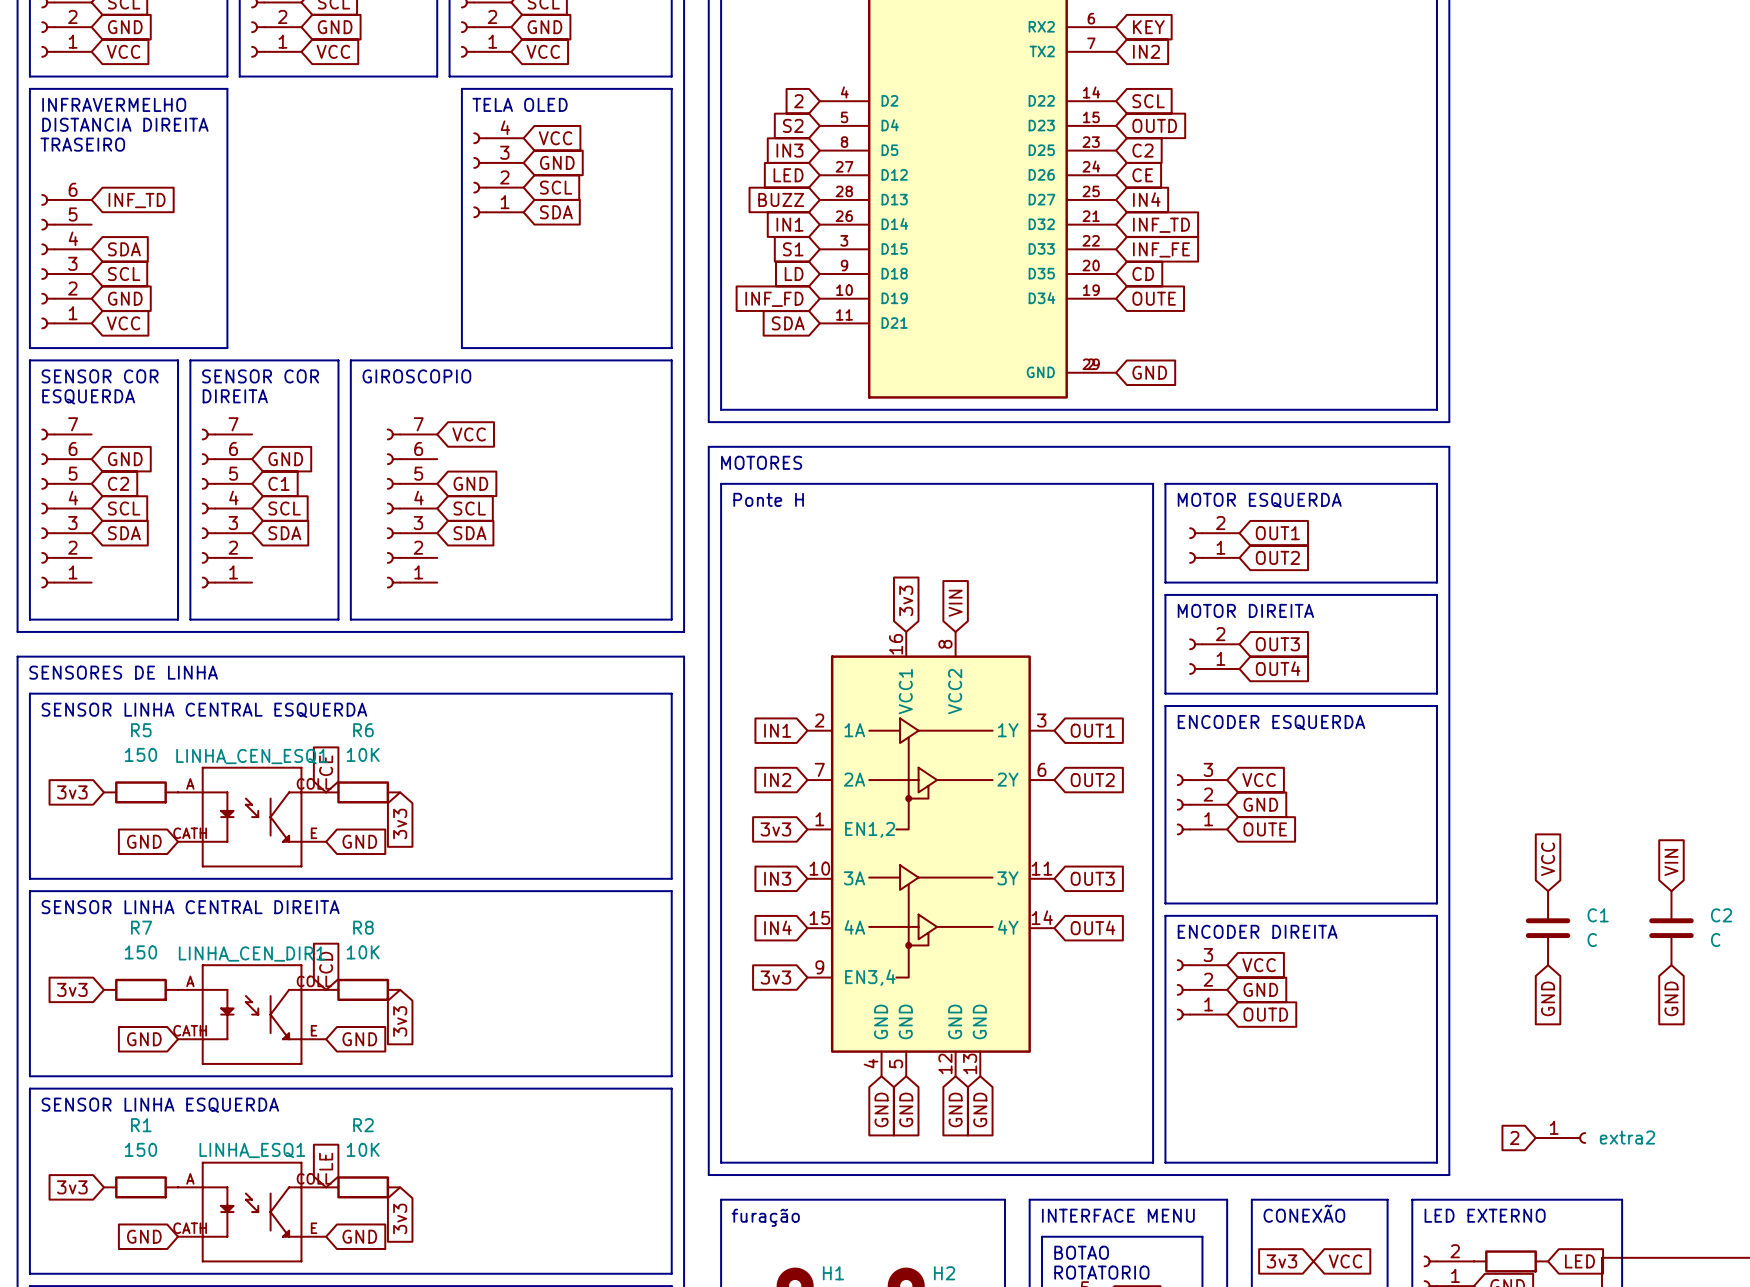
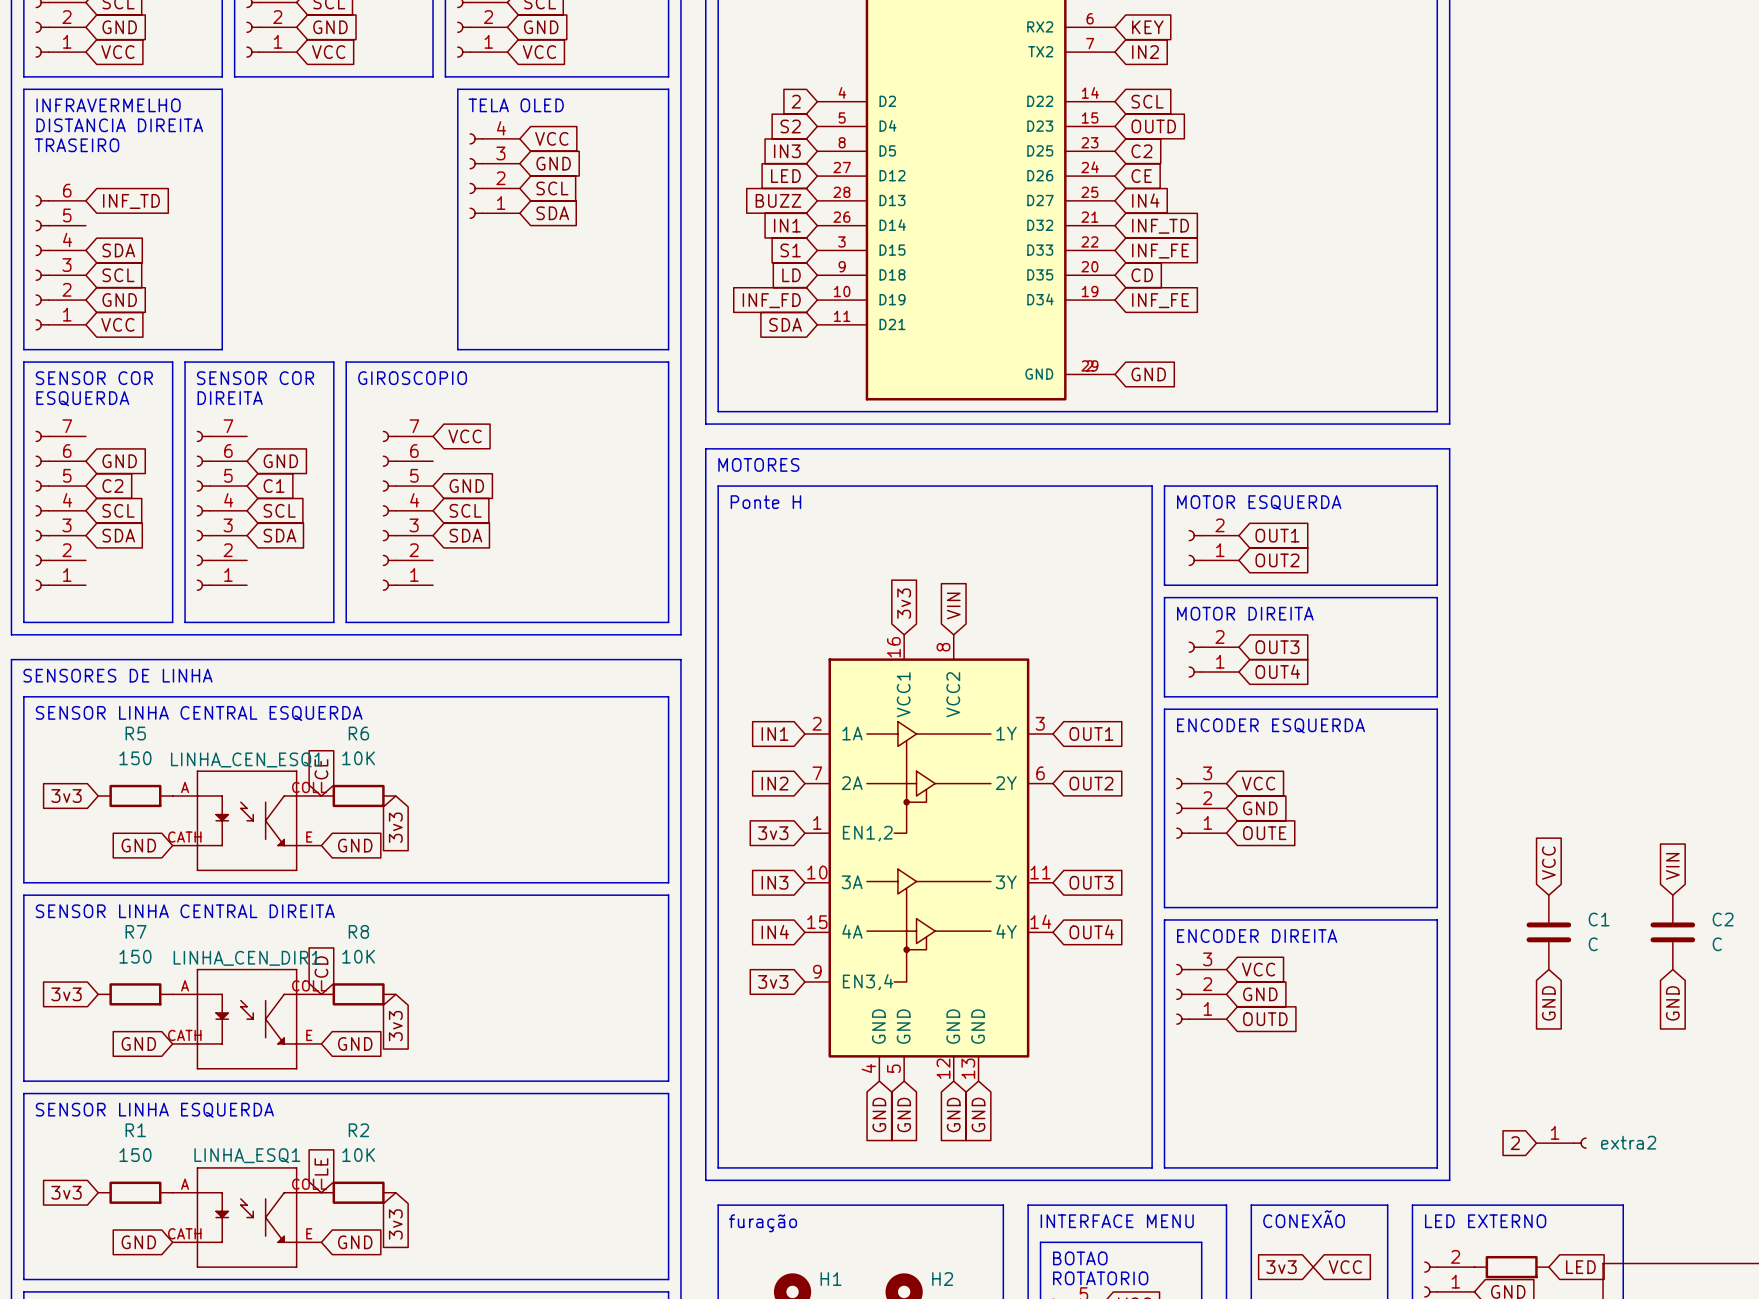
global label: OUTE (1154, 298) -> INF_FE (1160, 300)

